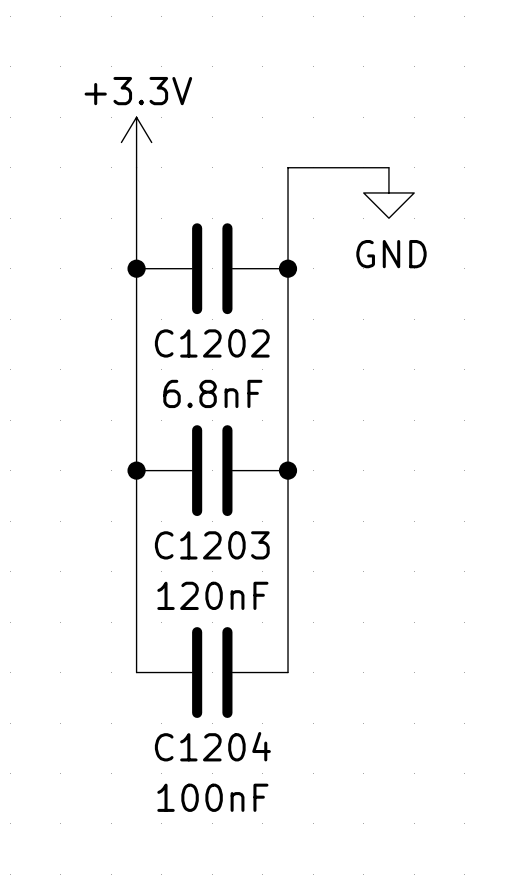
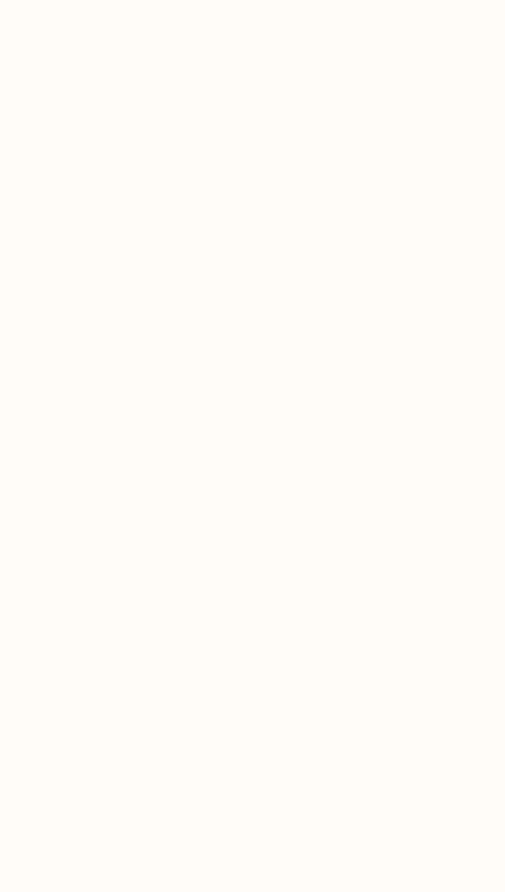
power symbol: +3.3V (136, 142) -> none
wire: (136, 167) (136, 672) -> none
wire: (388, 167) (288, 167) (288, 672) -> none
power symbol: GND (388, 192) -> none
junction: (136, 268) -> none
C1202: 6.8nF (212, 268) -> none
junction: (288, 268) -> none
junction: (136, 470) -> none
C1203: 120nF (212, 470) -> none
junction: (288, 470) -> none
C1204: 100nF (212, 672) -> none

